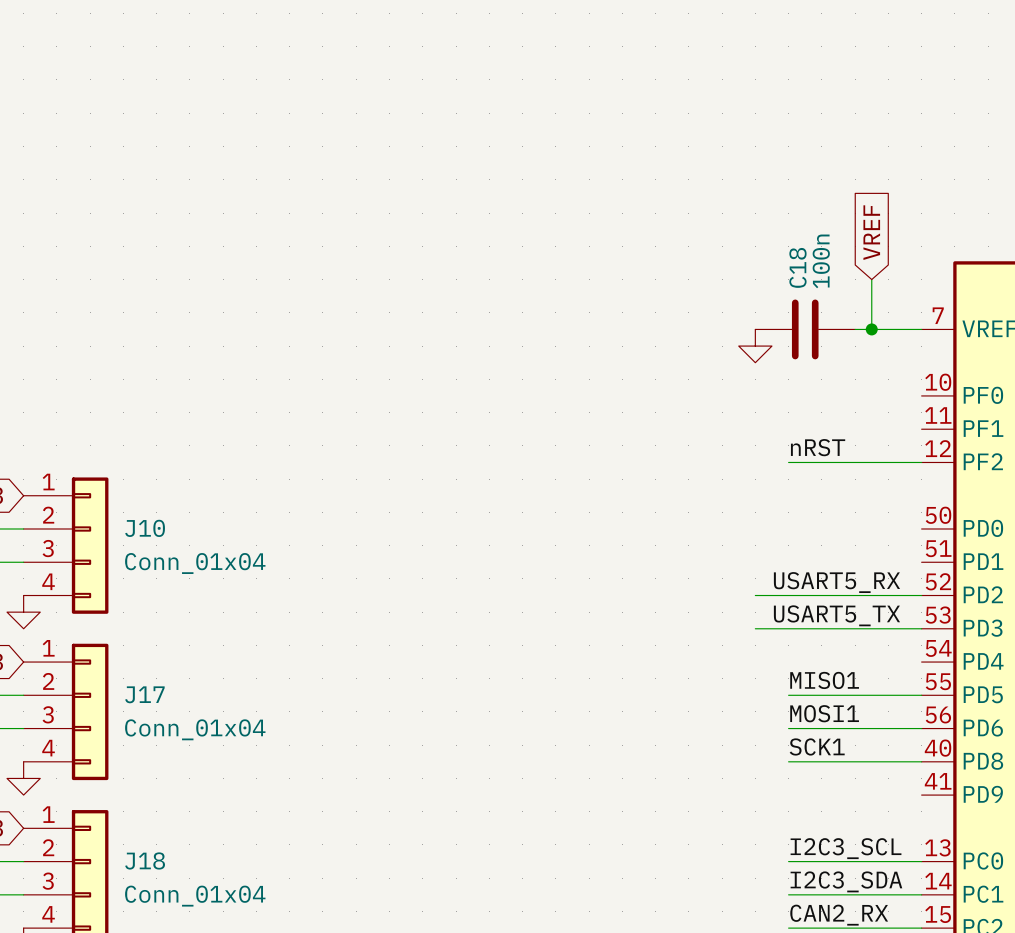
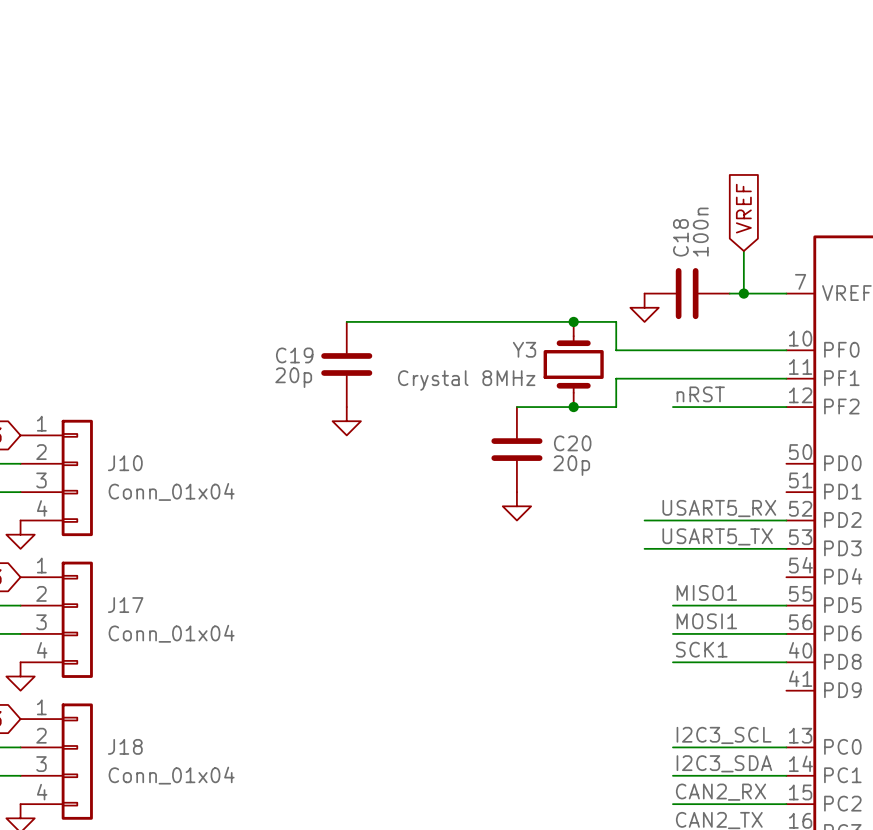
wire: none -> (346, 321) (616, 321) (616, 350) (786, 350)
junction: none -> (573, 321)
C19: none -> 20p (346, 364)
Y3: none -> Crystal 8MHz (573, 364)
wire: none -> (786, 378) (616, 378) (616, 407) (516, 407)
junction: none -> (573, 407)
power symbol: none -> (346, 421)
C20: none -> 20p (516, 449)
power symbol: none -> (516, 506)

